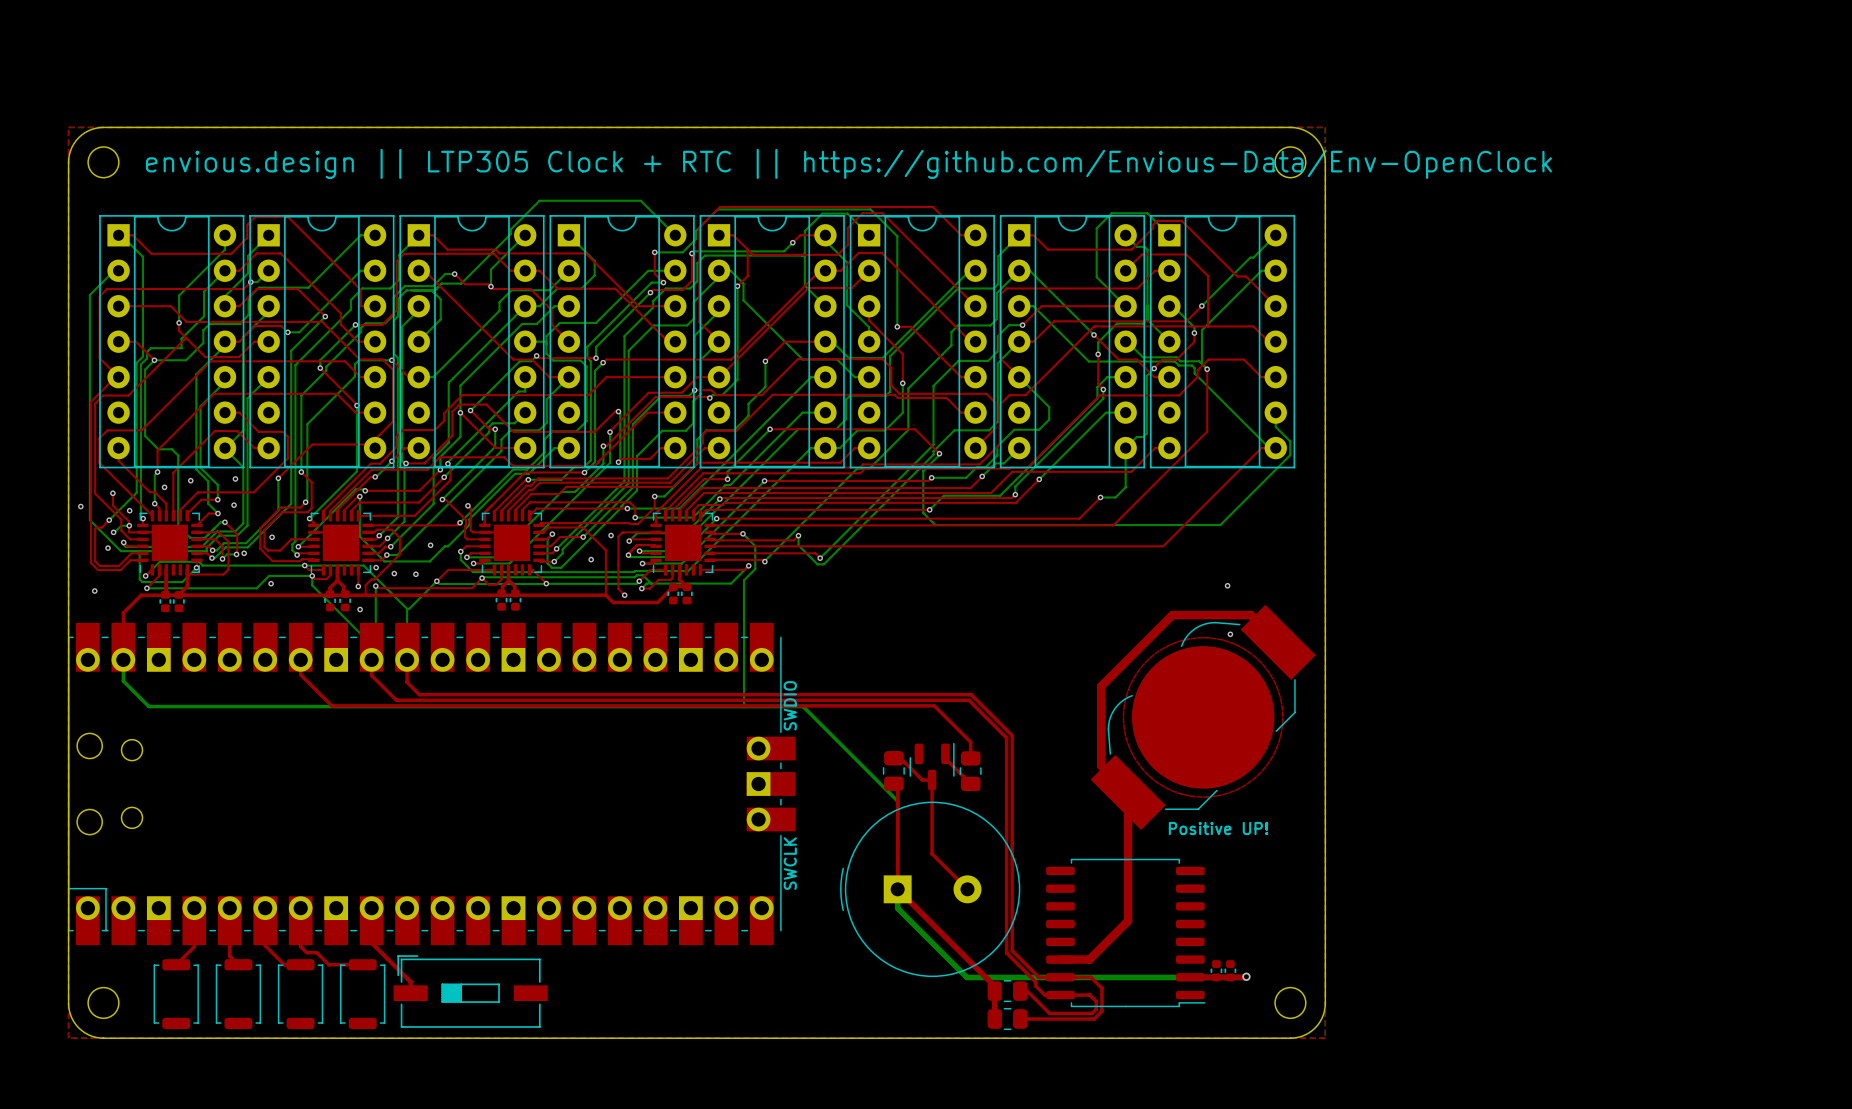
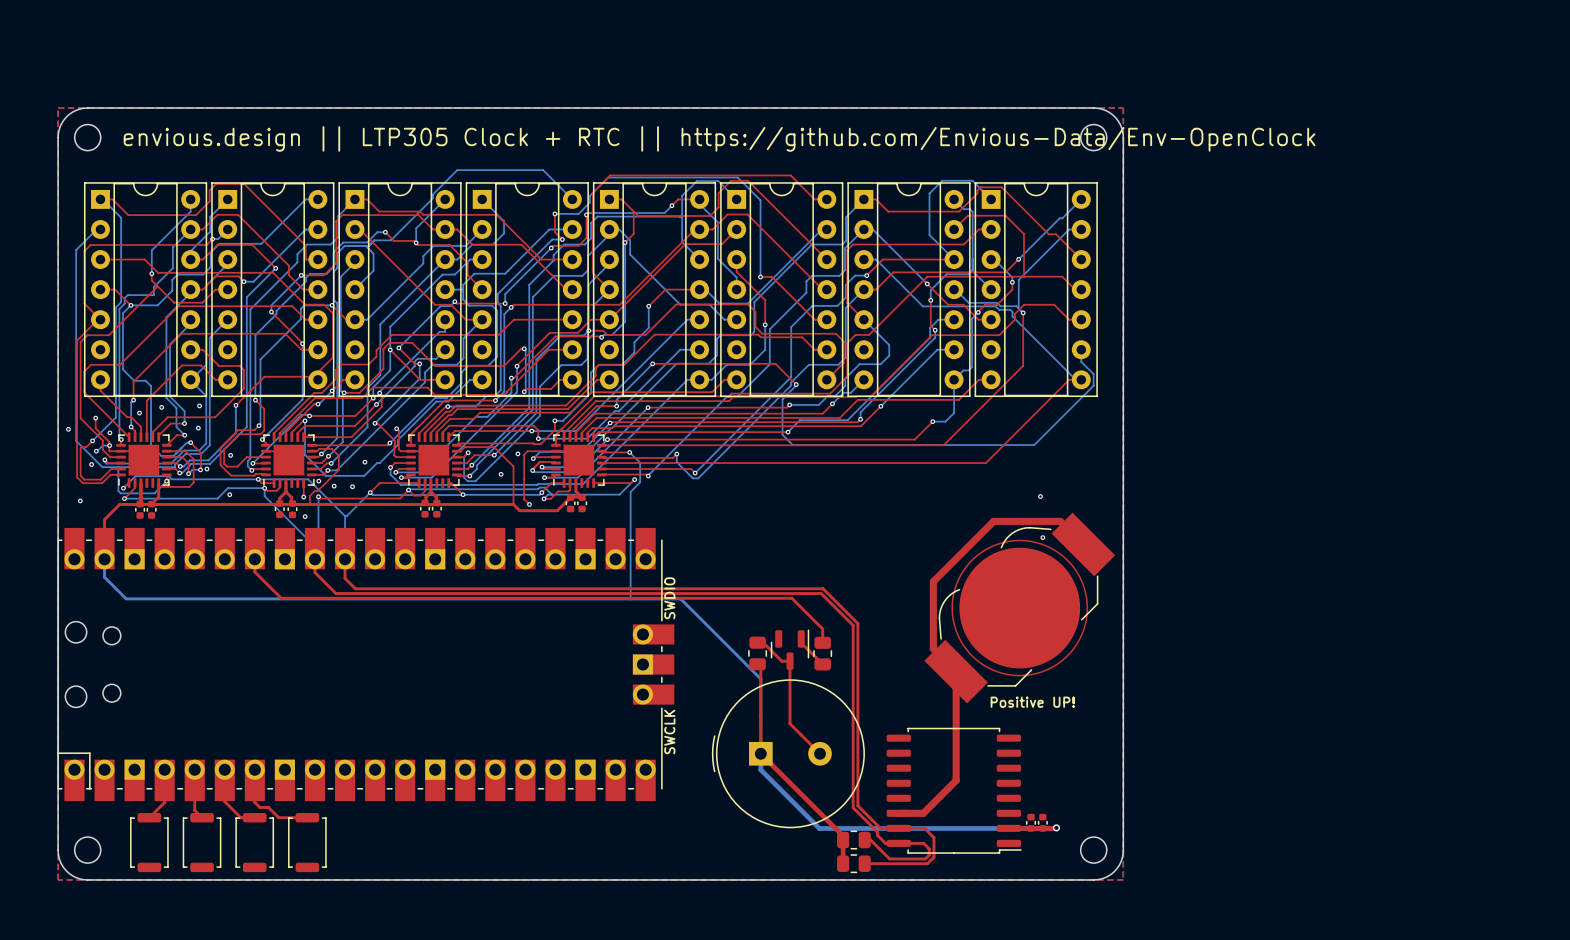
top track: (371, 908) (371, 942) (410, 981) (410, 993) -> none
part: (470, 991) -> none

